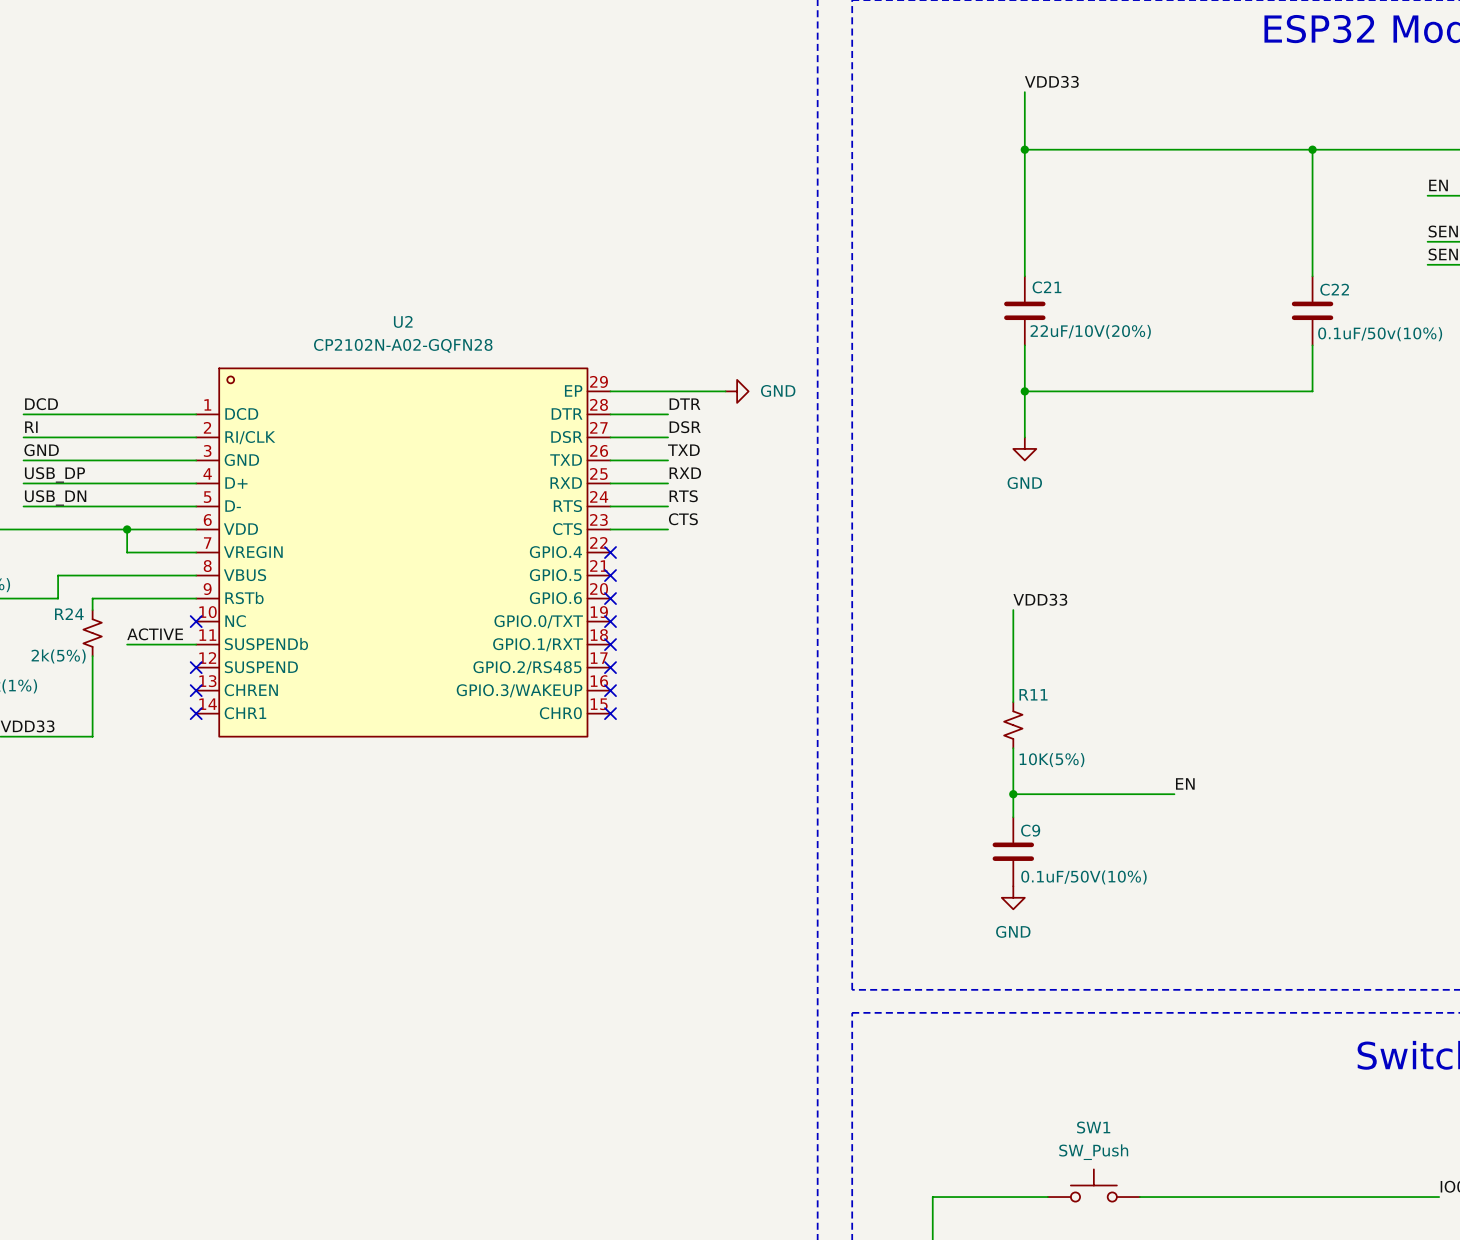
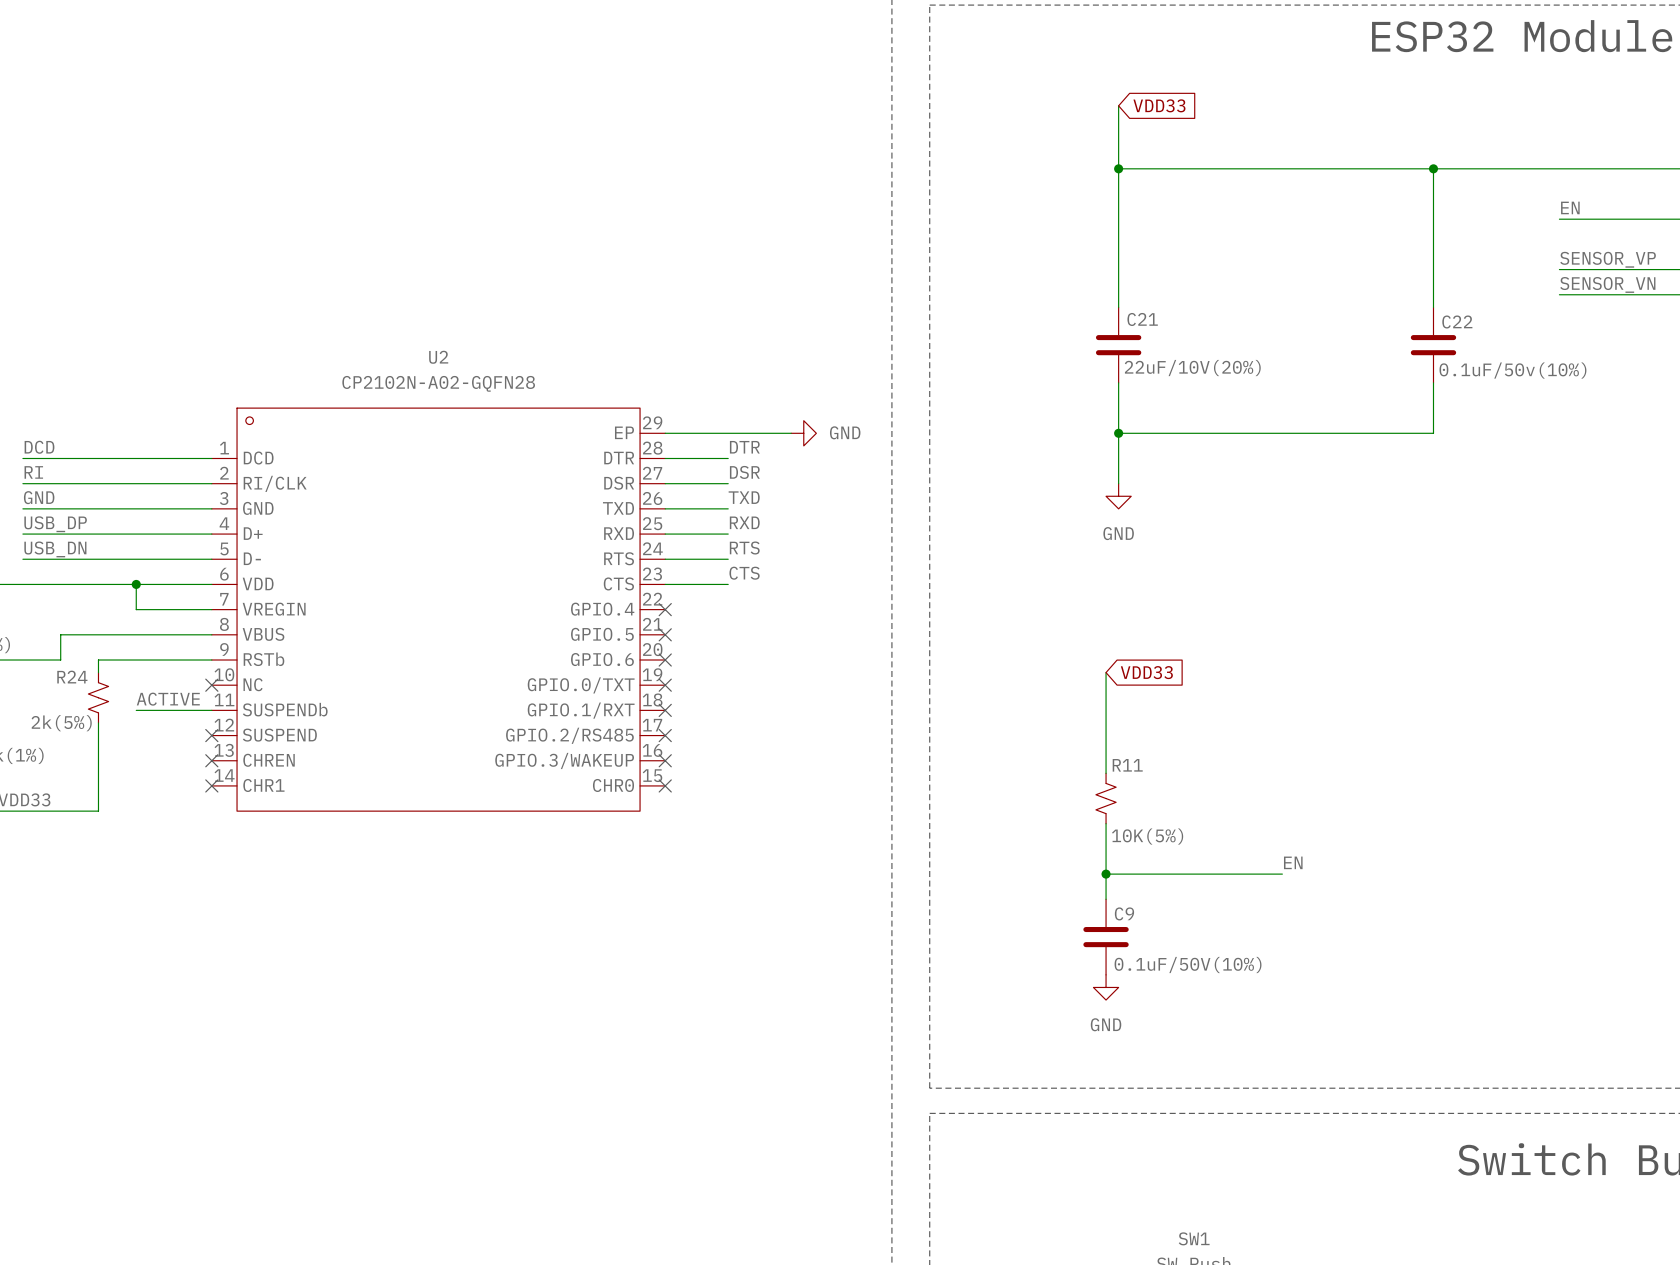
label: VDD33 (1051, 81) -> none
global label: none -> VDD33 (1159, 105)
label: VDD33 (1040, 599) -> none
global label: none -> VDD33 (1146, 672)

